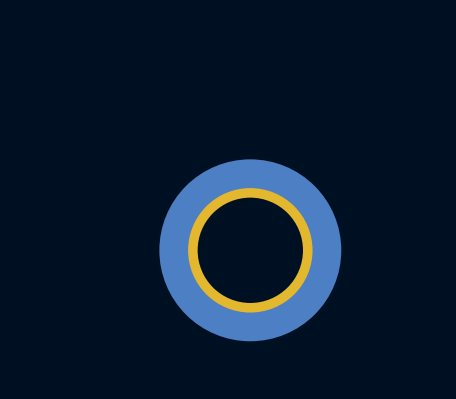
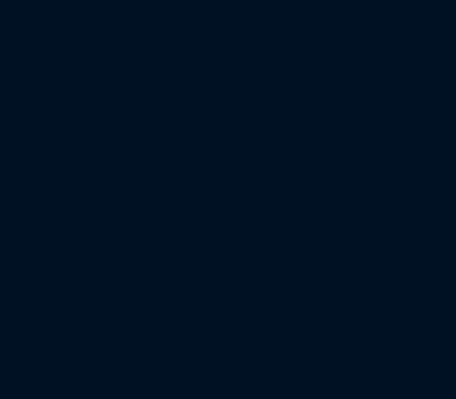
part: (250, 250) -> none

